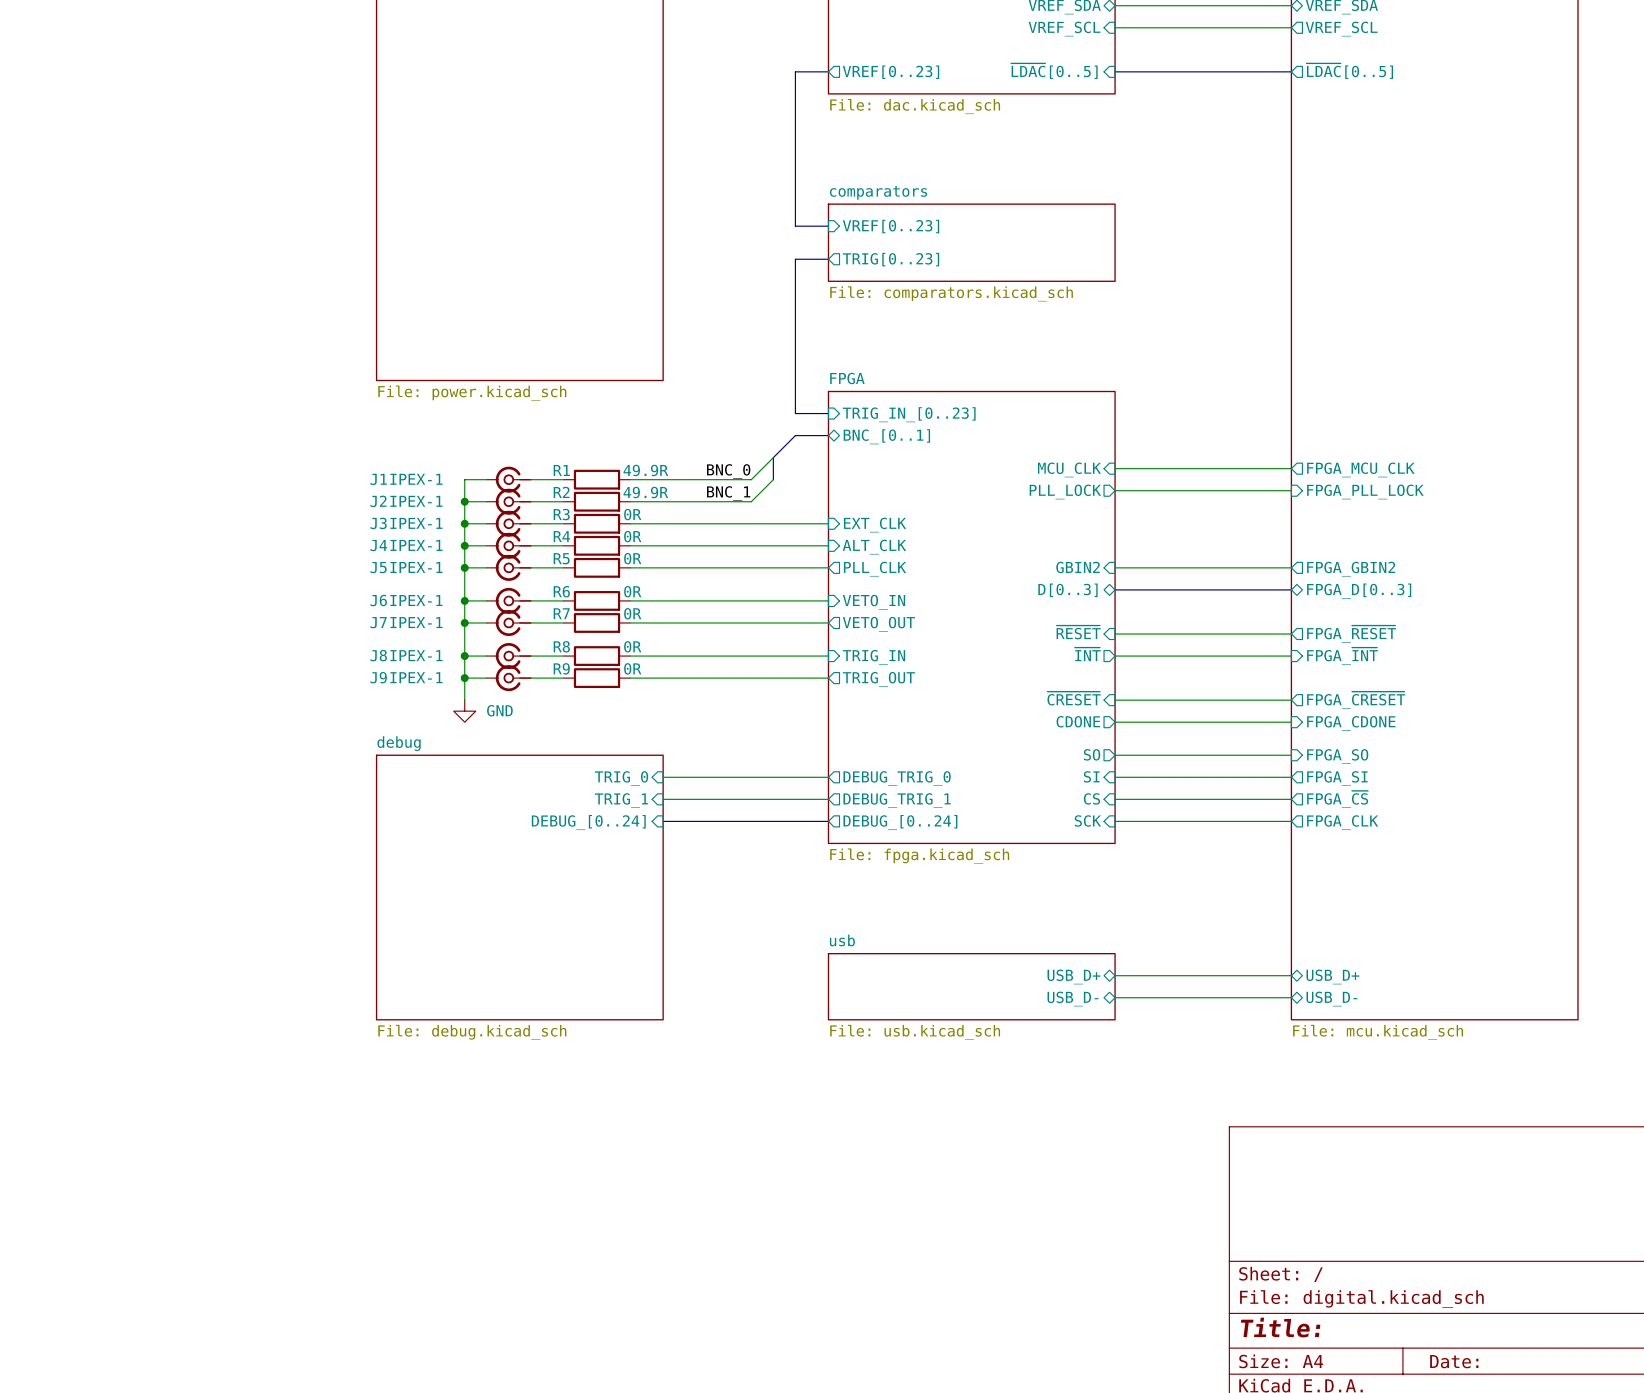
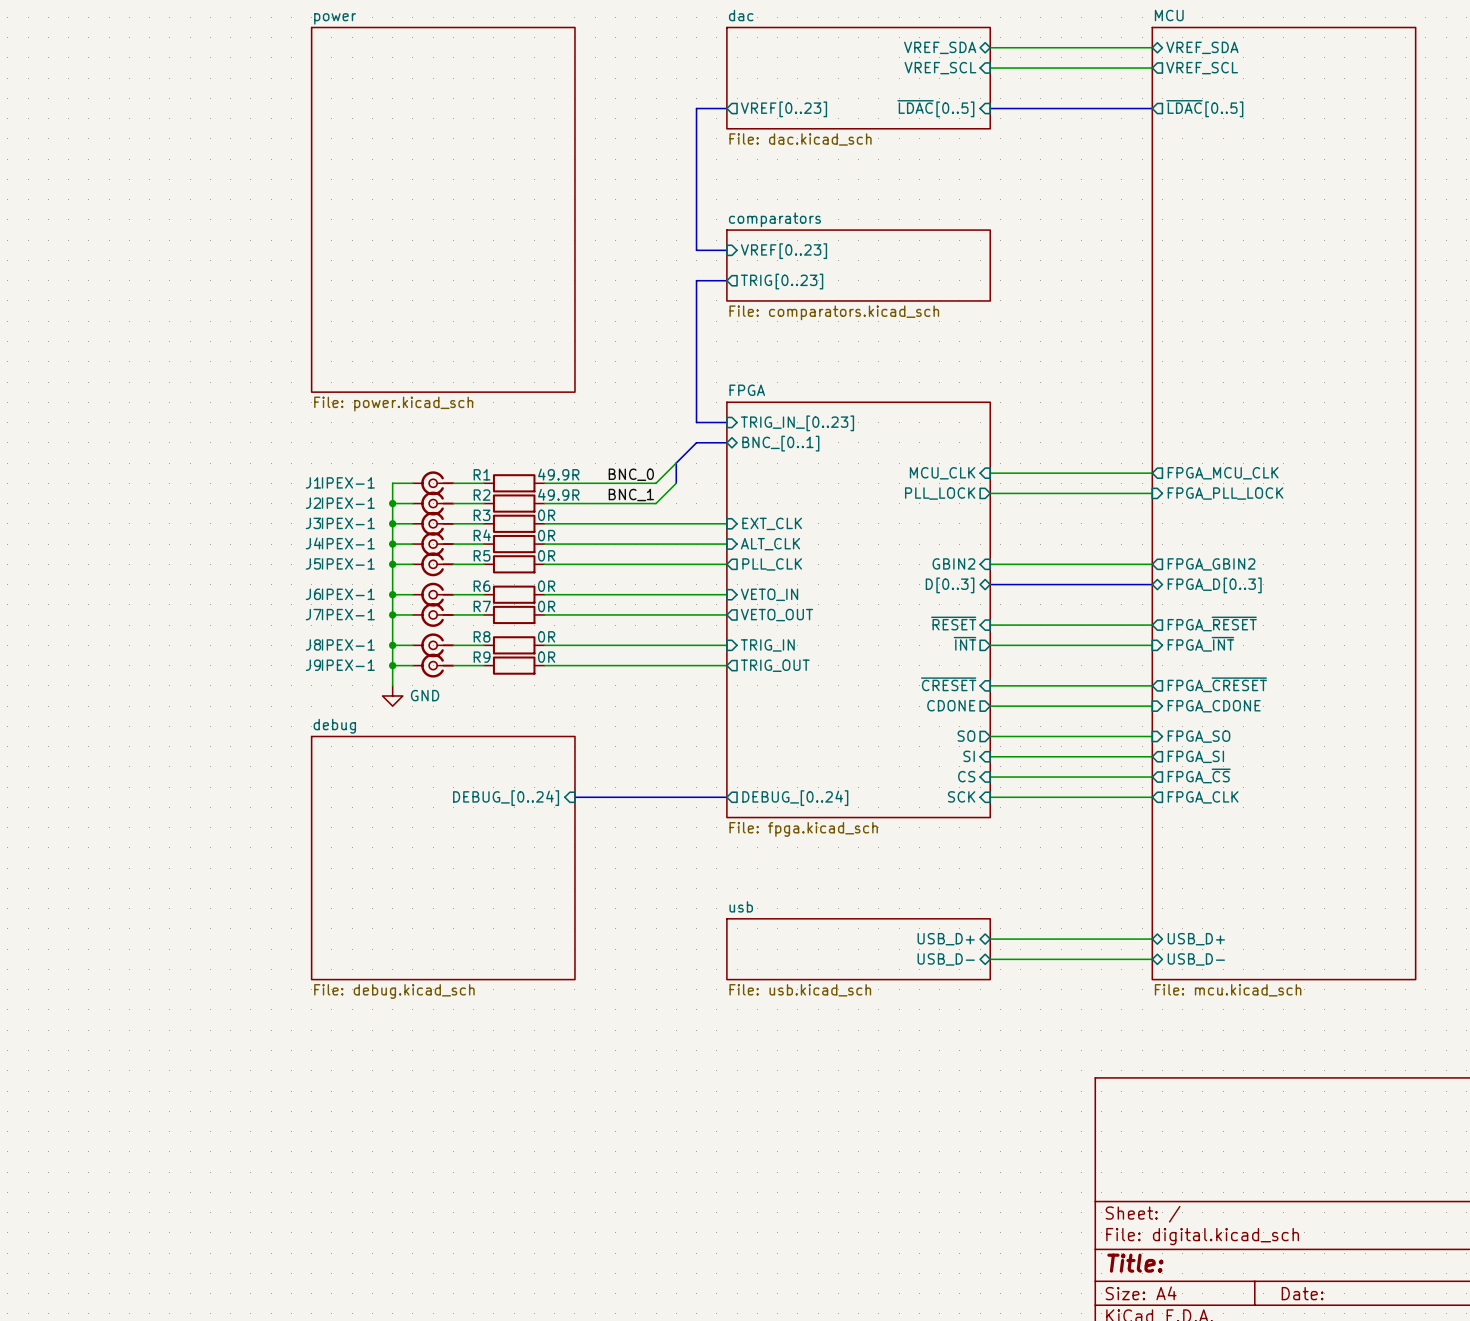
wire: (663, 777) (828, 777) -> none
sheet pin: TRIG_0 (621, 778) -> none
sheet pin: DEBUG_TRIG_0 (897, 778) -> none
wire: (663, 799) (828, 799) -> none
sheet pin: TRIG_1 (621, 800) -> none
sheet pin: DEBUG_TRIG_1 (897, 800) -> none

